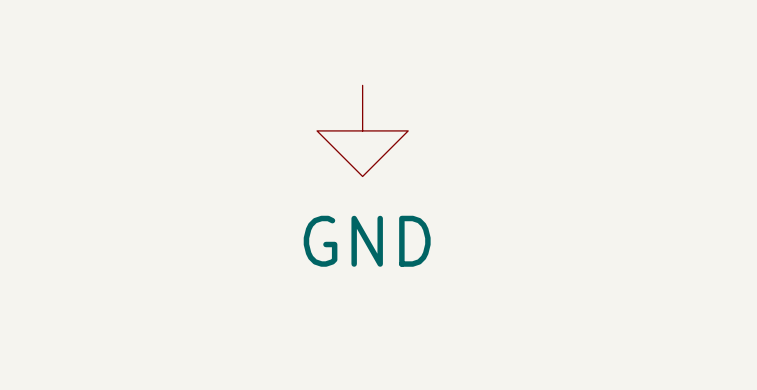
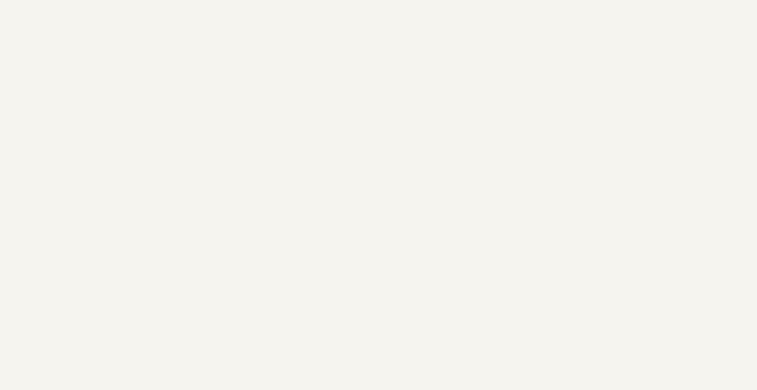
power symbol: GND (362, 130) -> none

